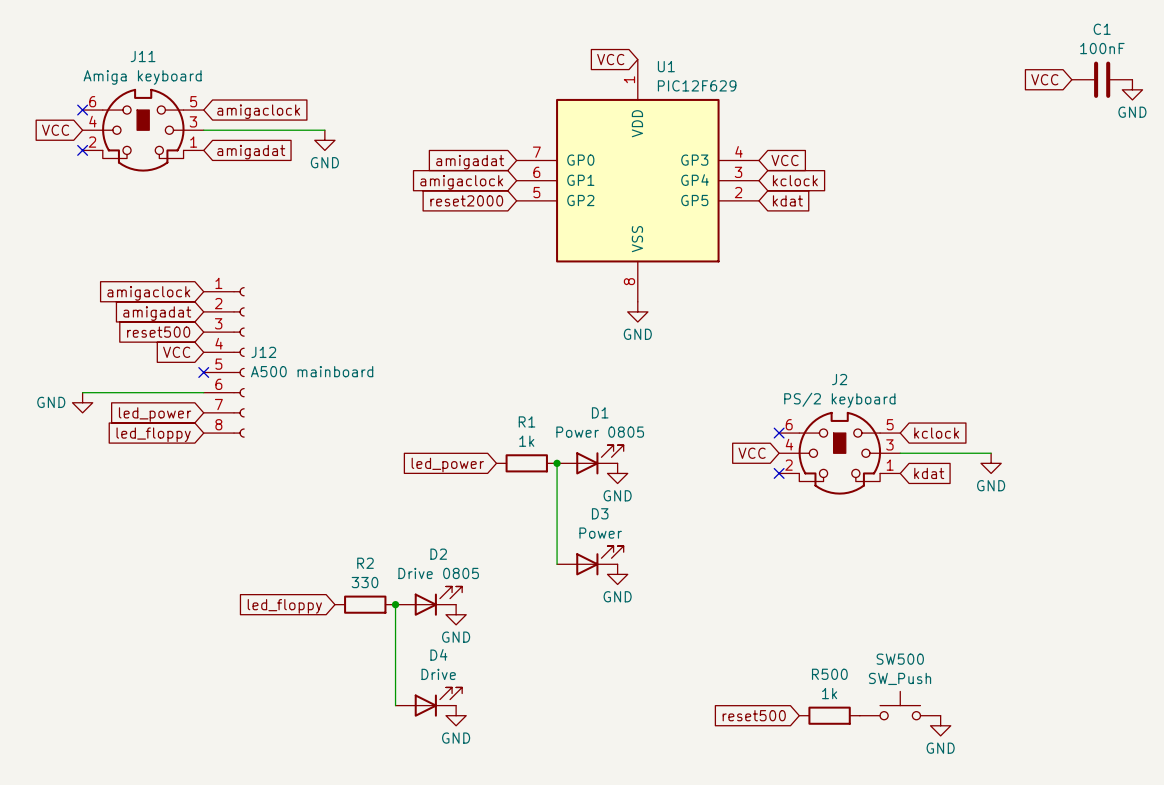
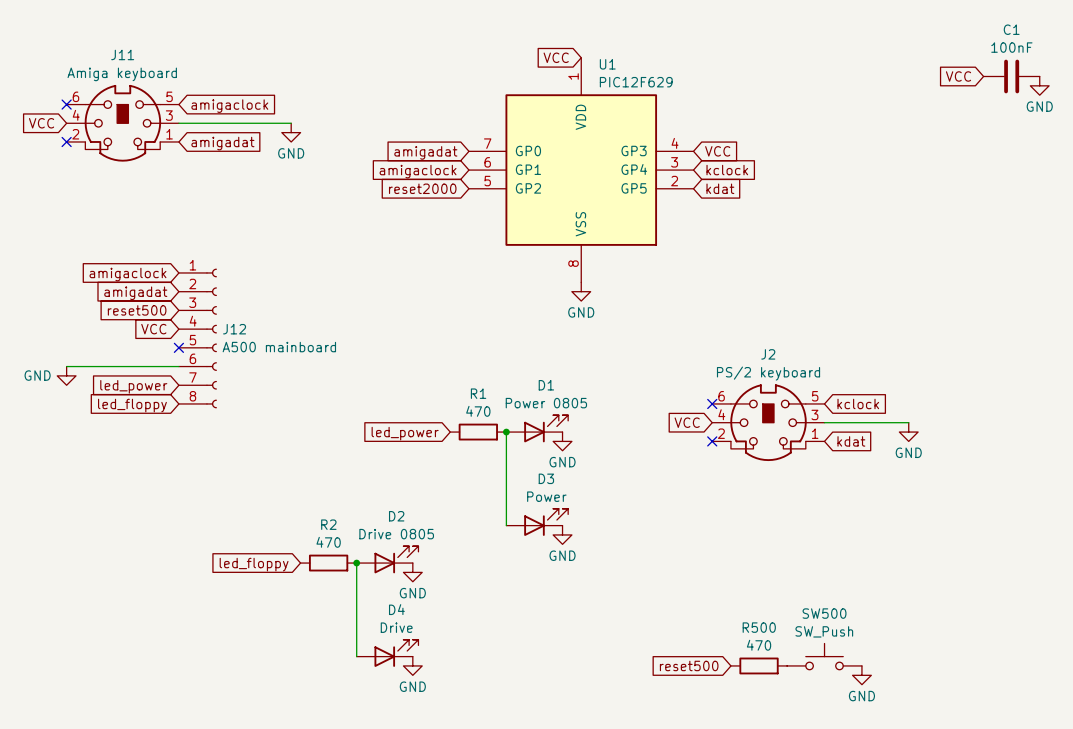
R1 value: 1k (526, 441) -> 470 (478, 411)
R2 value: 330 (365, 582) -> 470 (328, 542)
R500 value: 1k (829, 693) -> 470 (759, 645)

